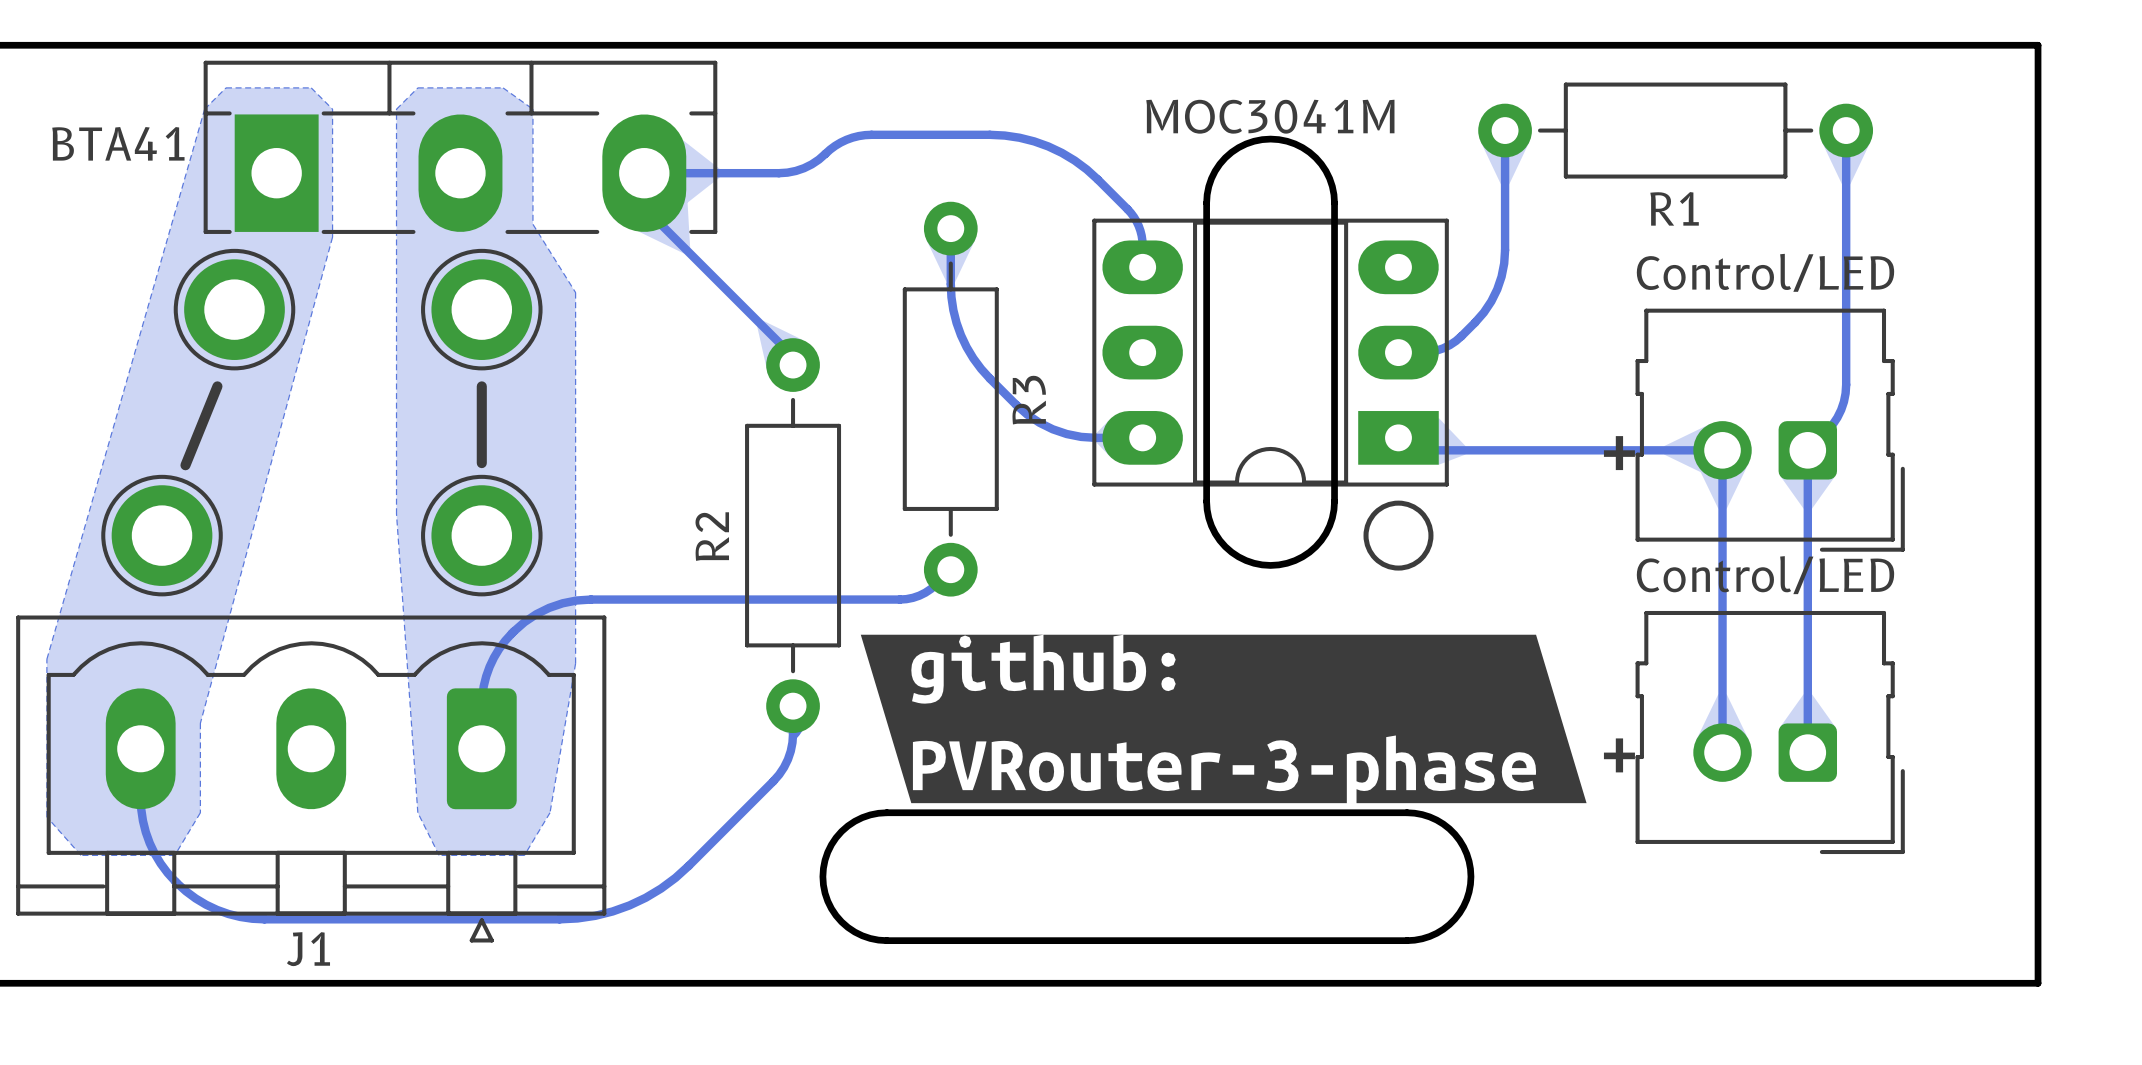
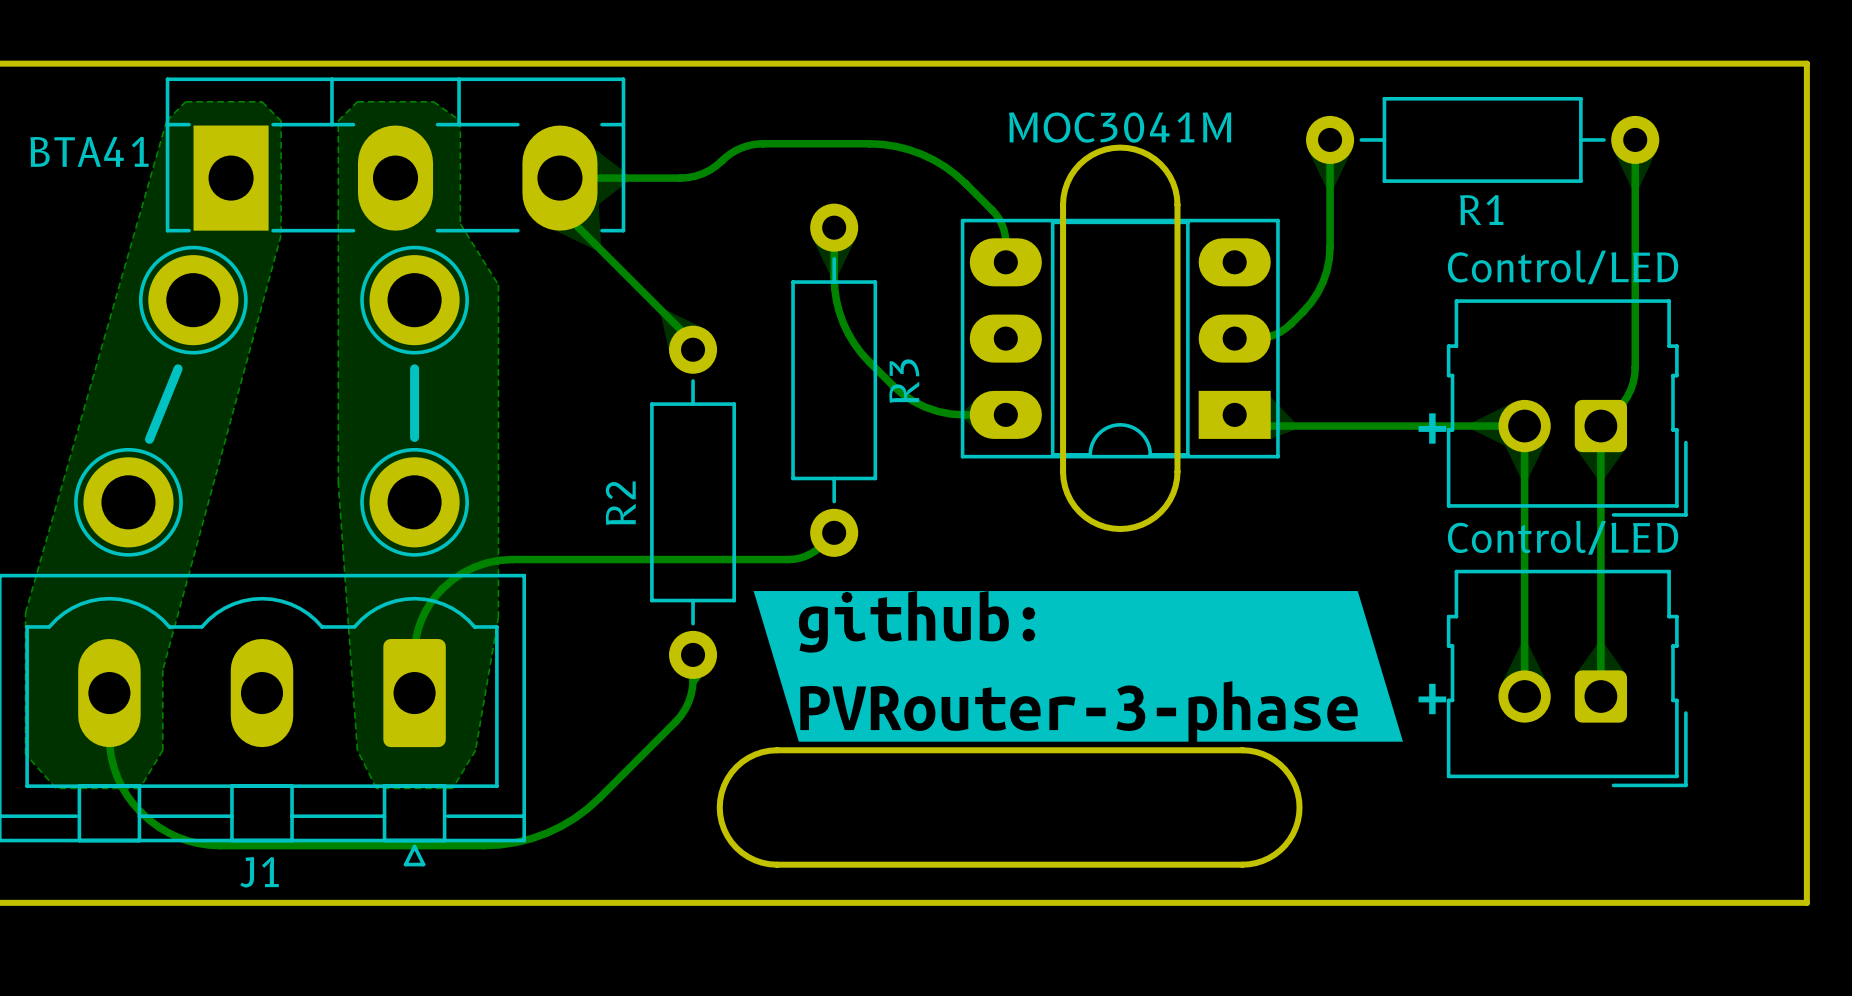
drawing: [1363, 500, 1434, 571] -> none

